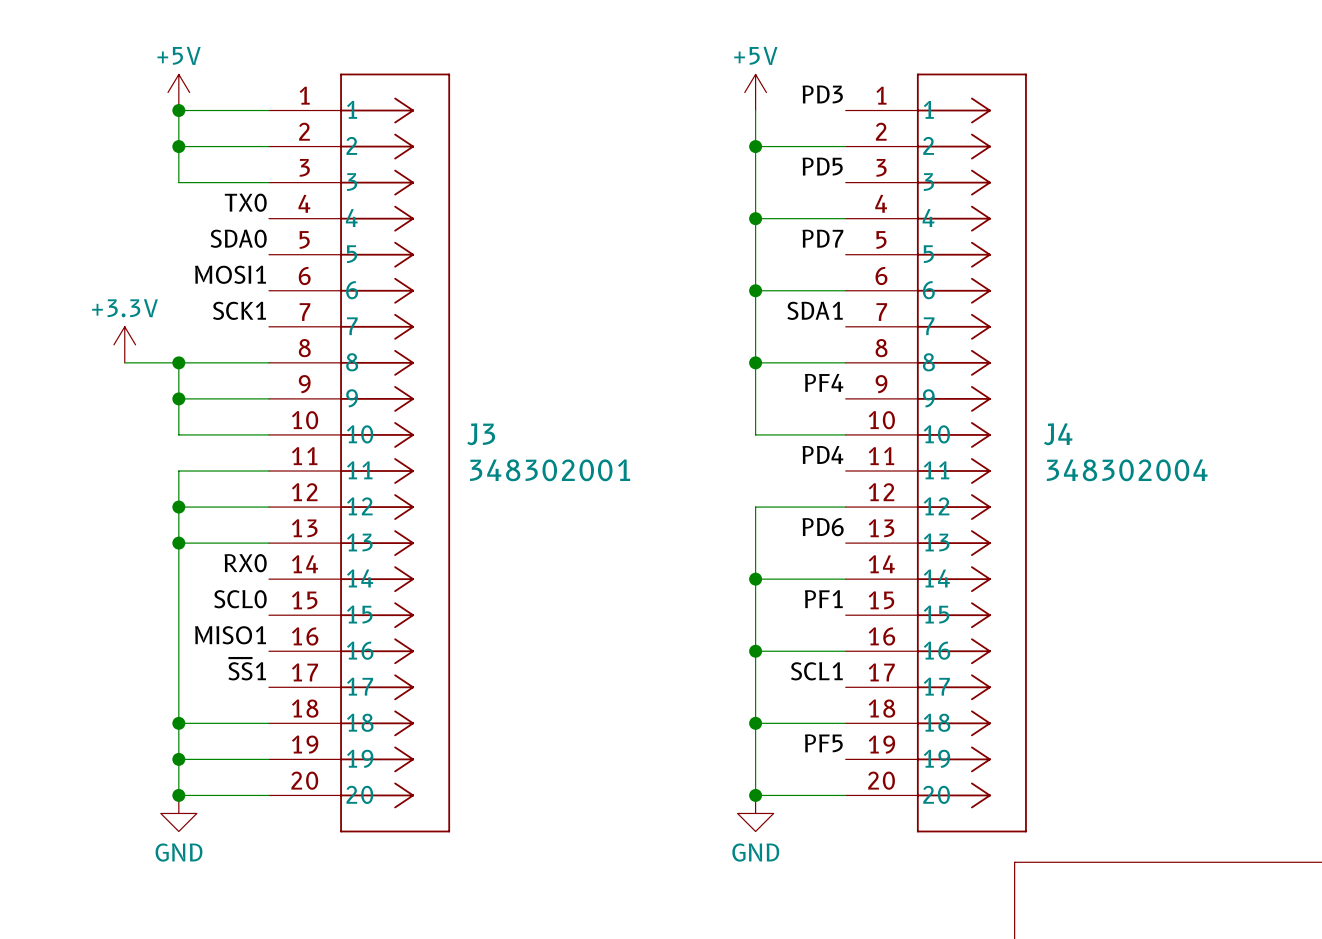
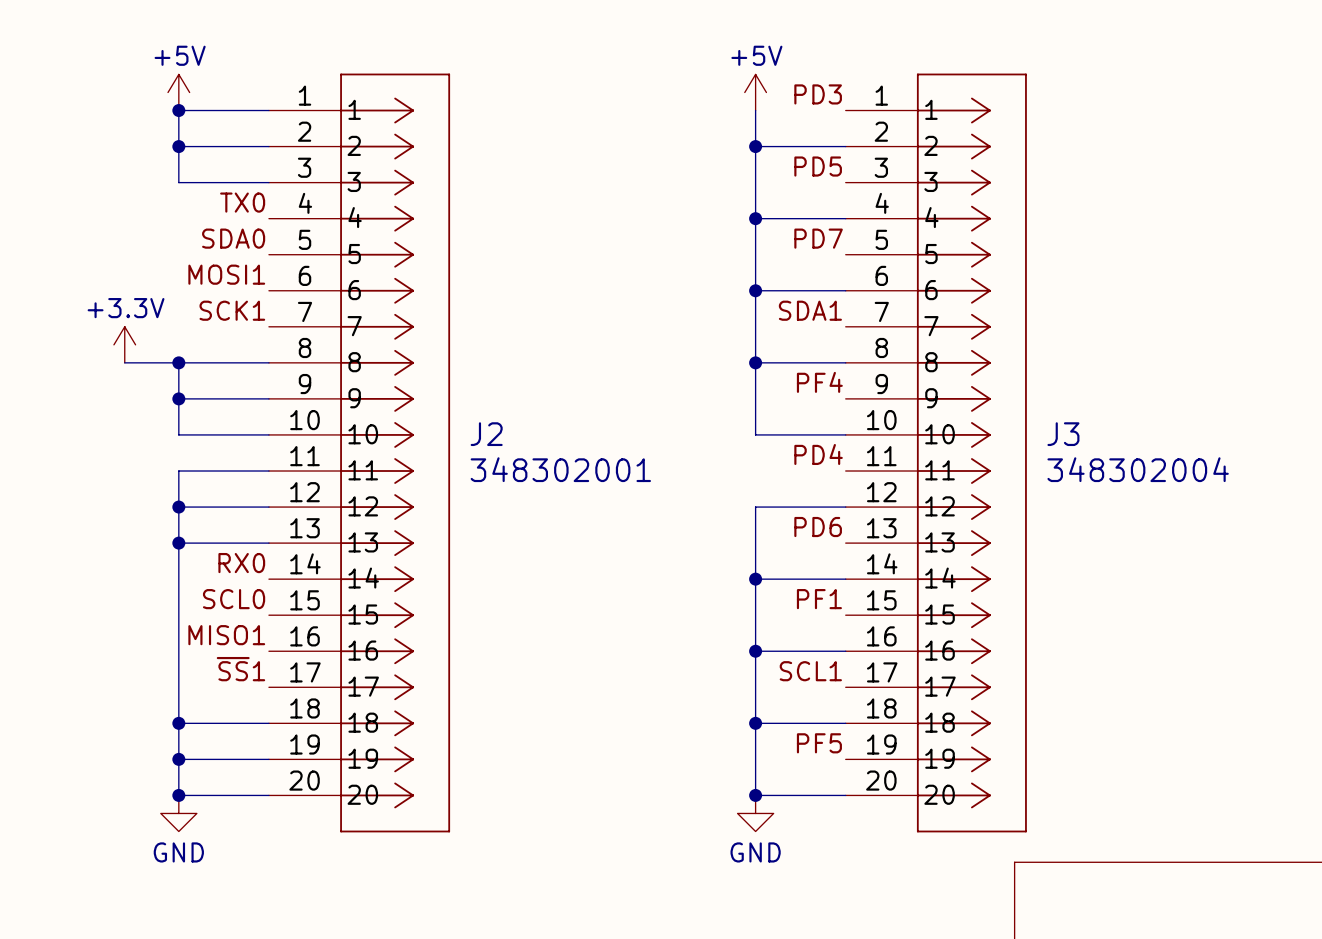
J3 name: J3 (481, 434) -> J2 (486, 434)
J4 name: J4 (1058, 434) -> J3 (1063, 434)

